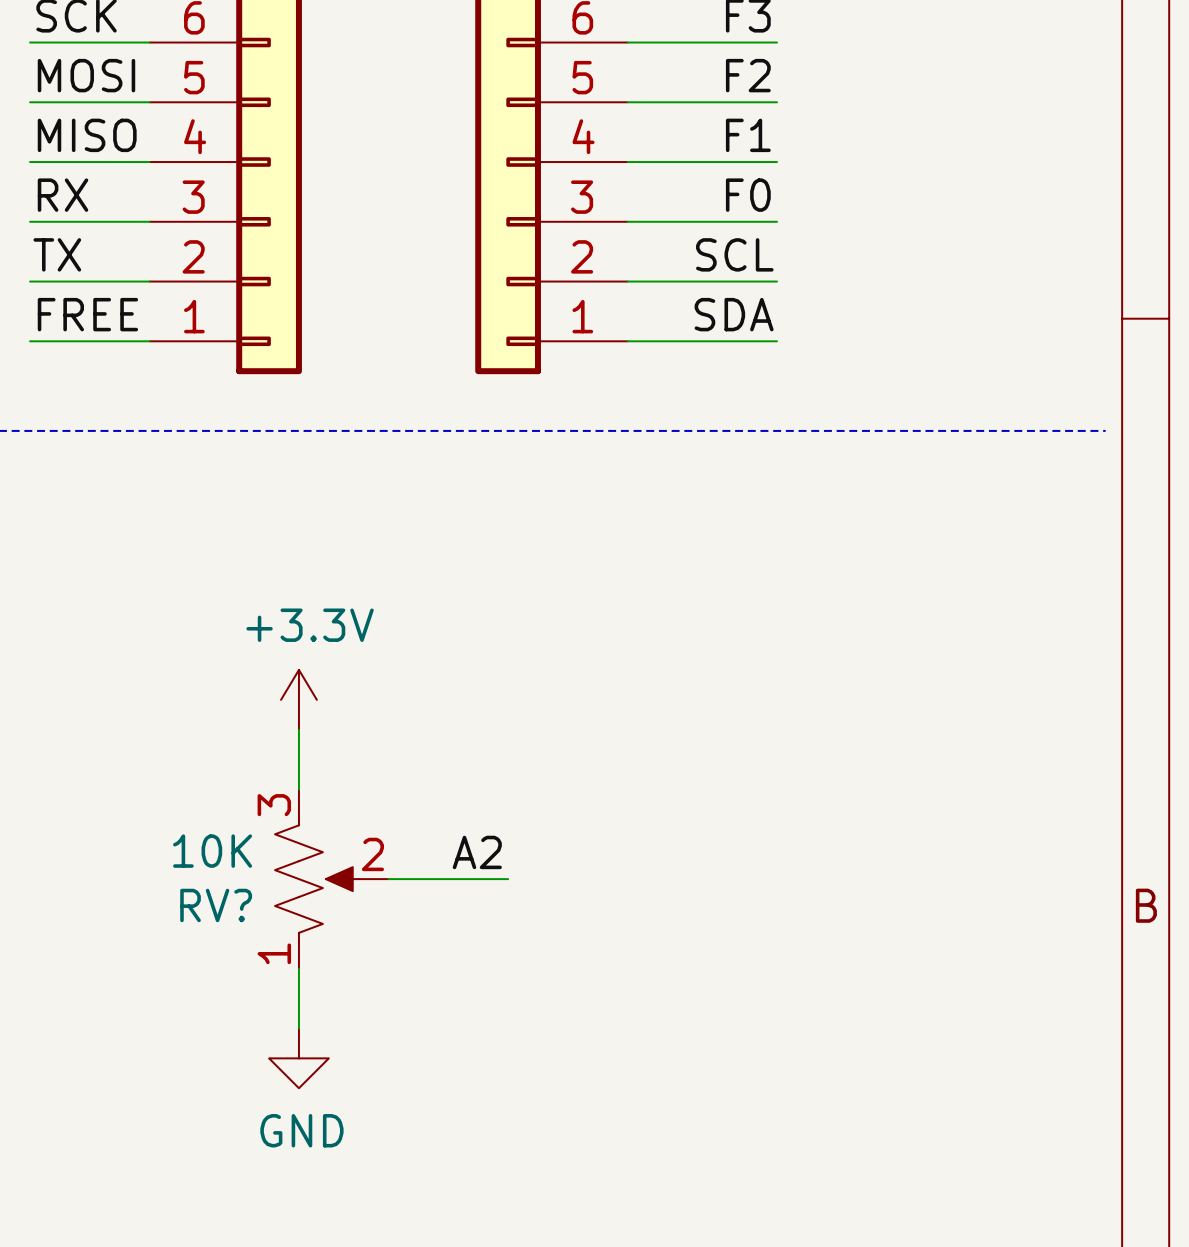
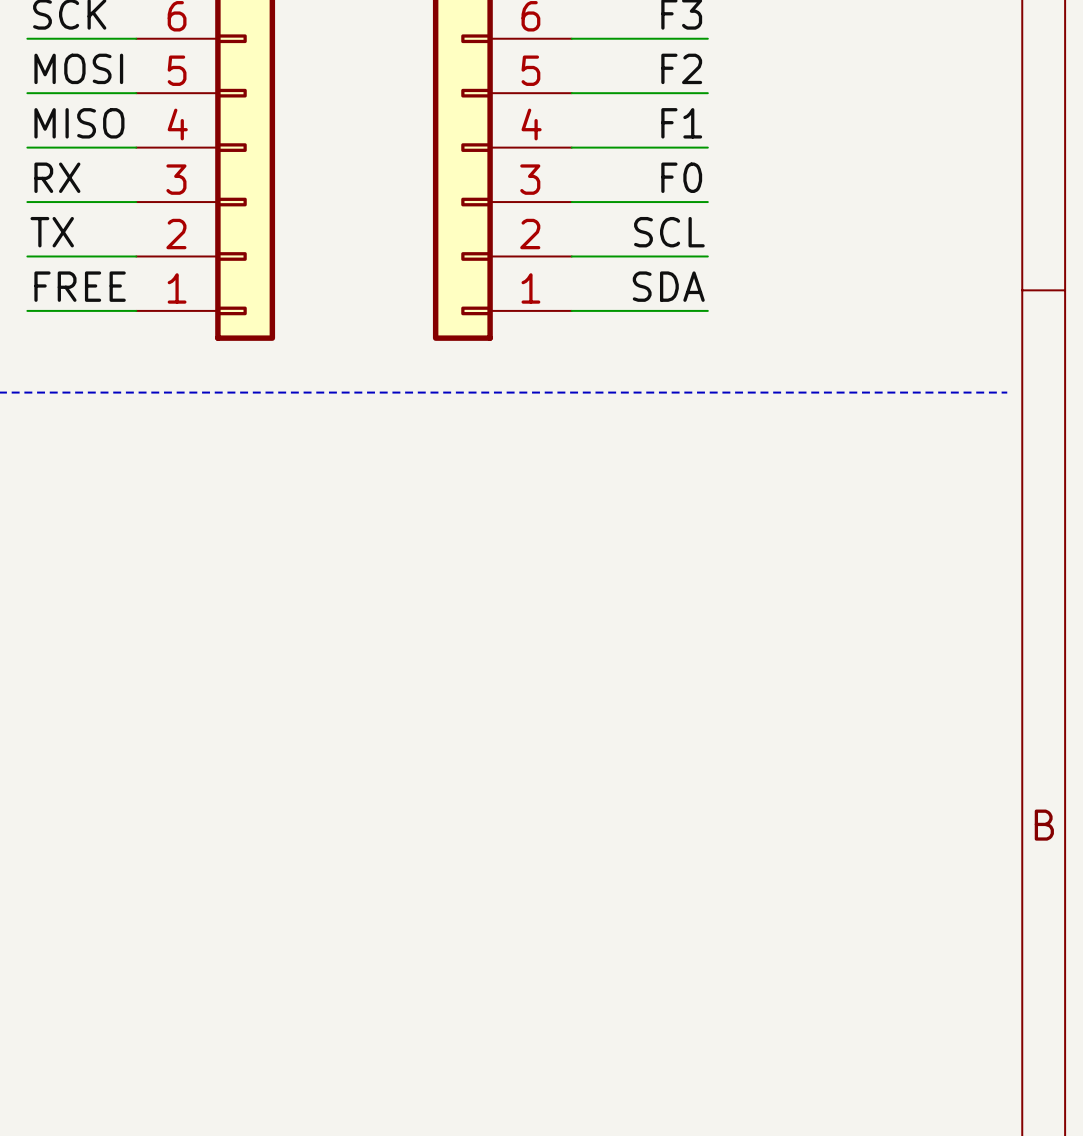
power symbol: +3.3V (298, 699) -> none
wire: (298, 729) (298, 789) -> none
label: A2 (477, 852) -> none
RV?: 10K (331, 879) -> none
wire: (388, 879) (508, 879) -> none
wire: (298, 968) (298, 1028) -> none
power symbol: GND (298, 1058) -> none

